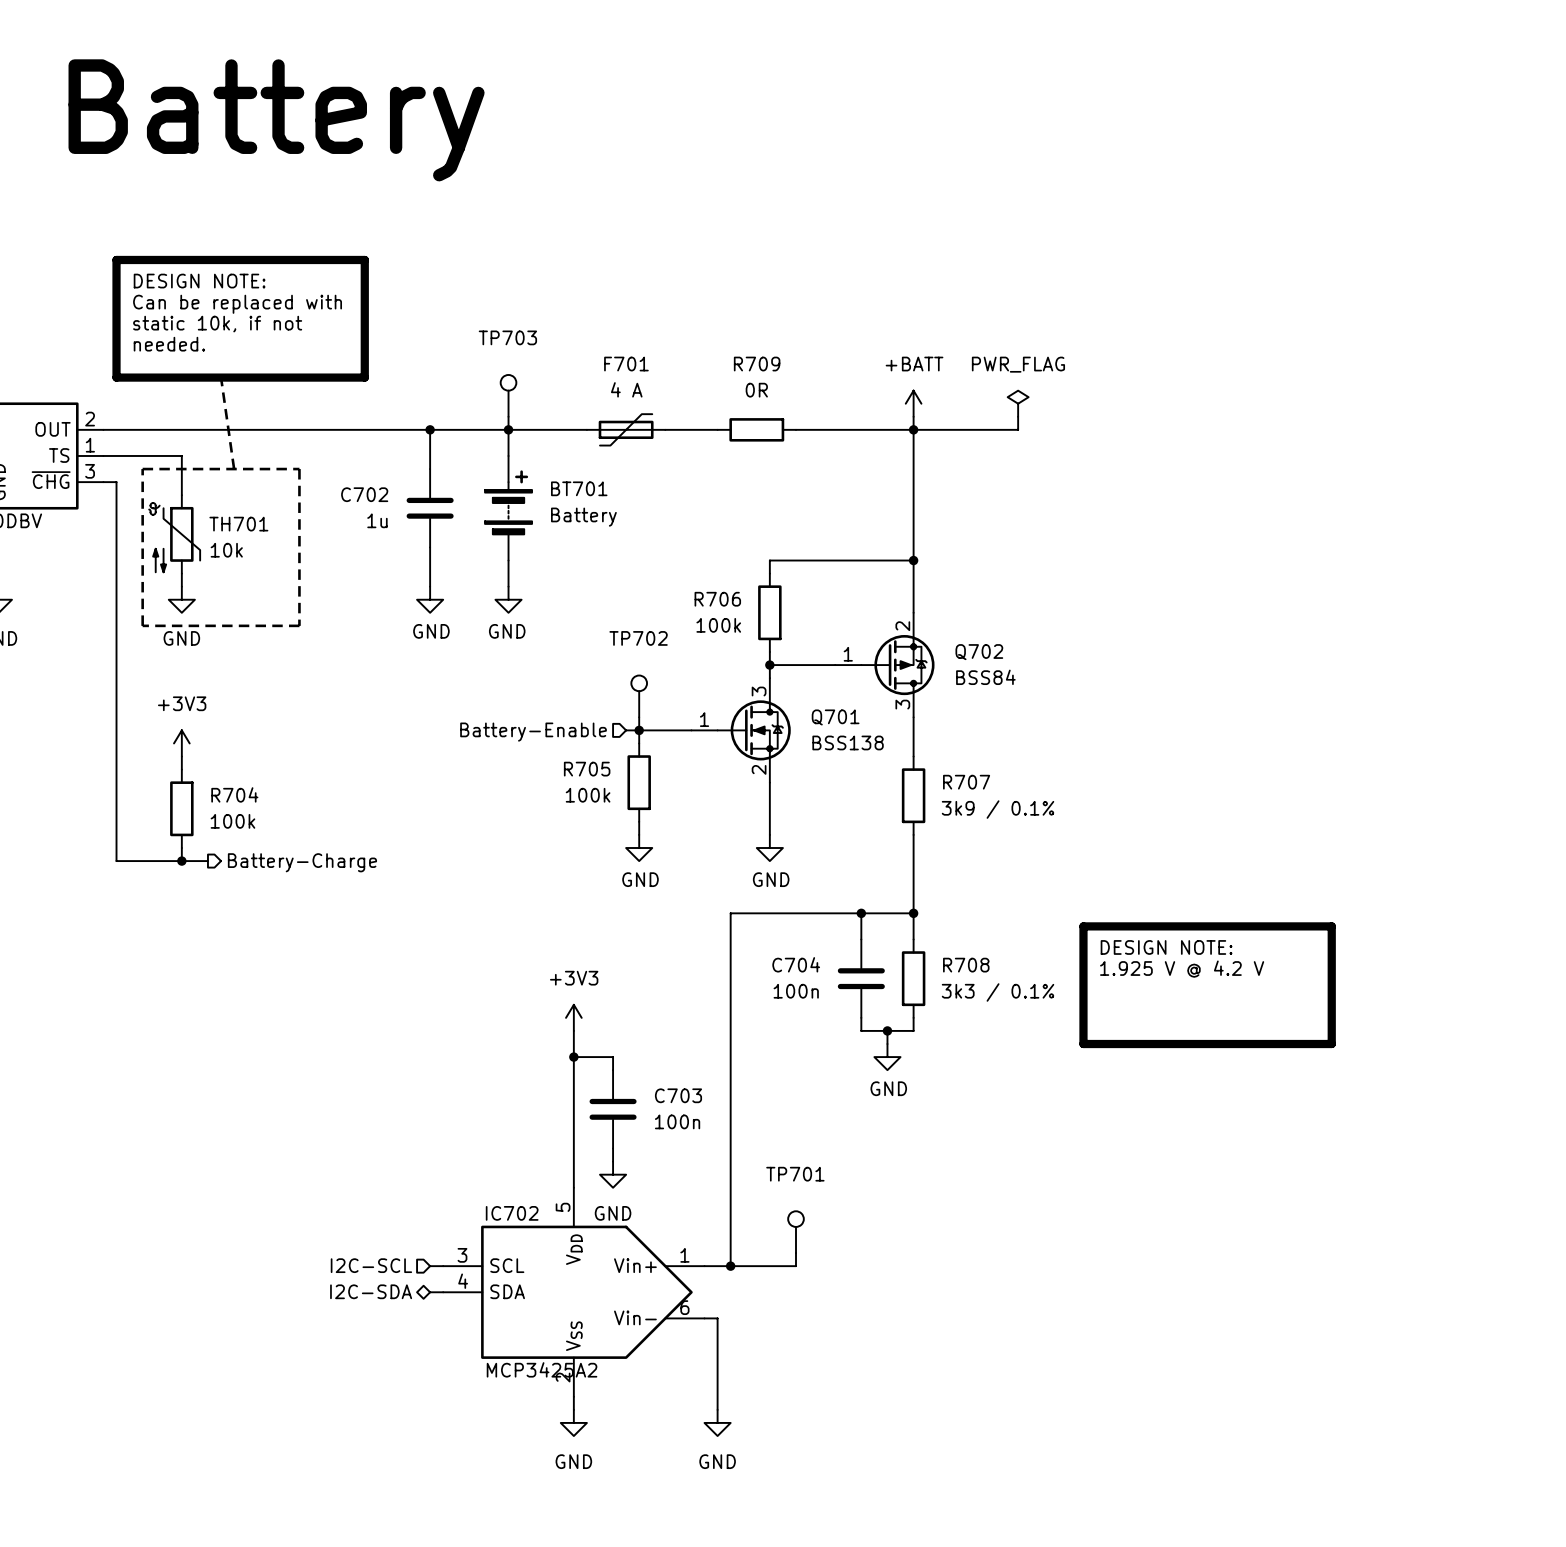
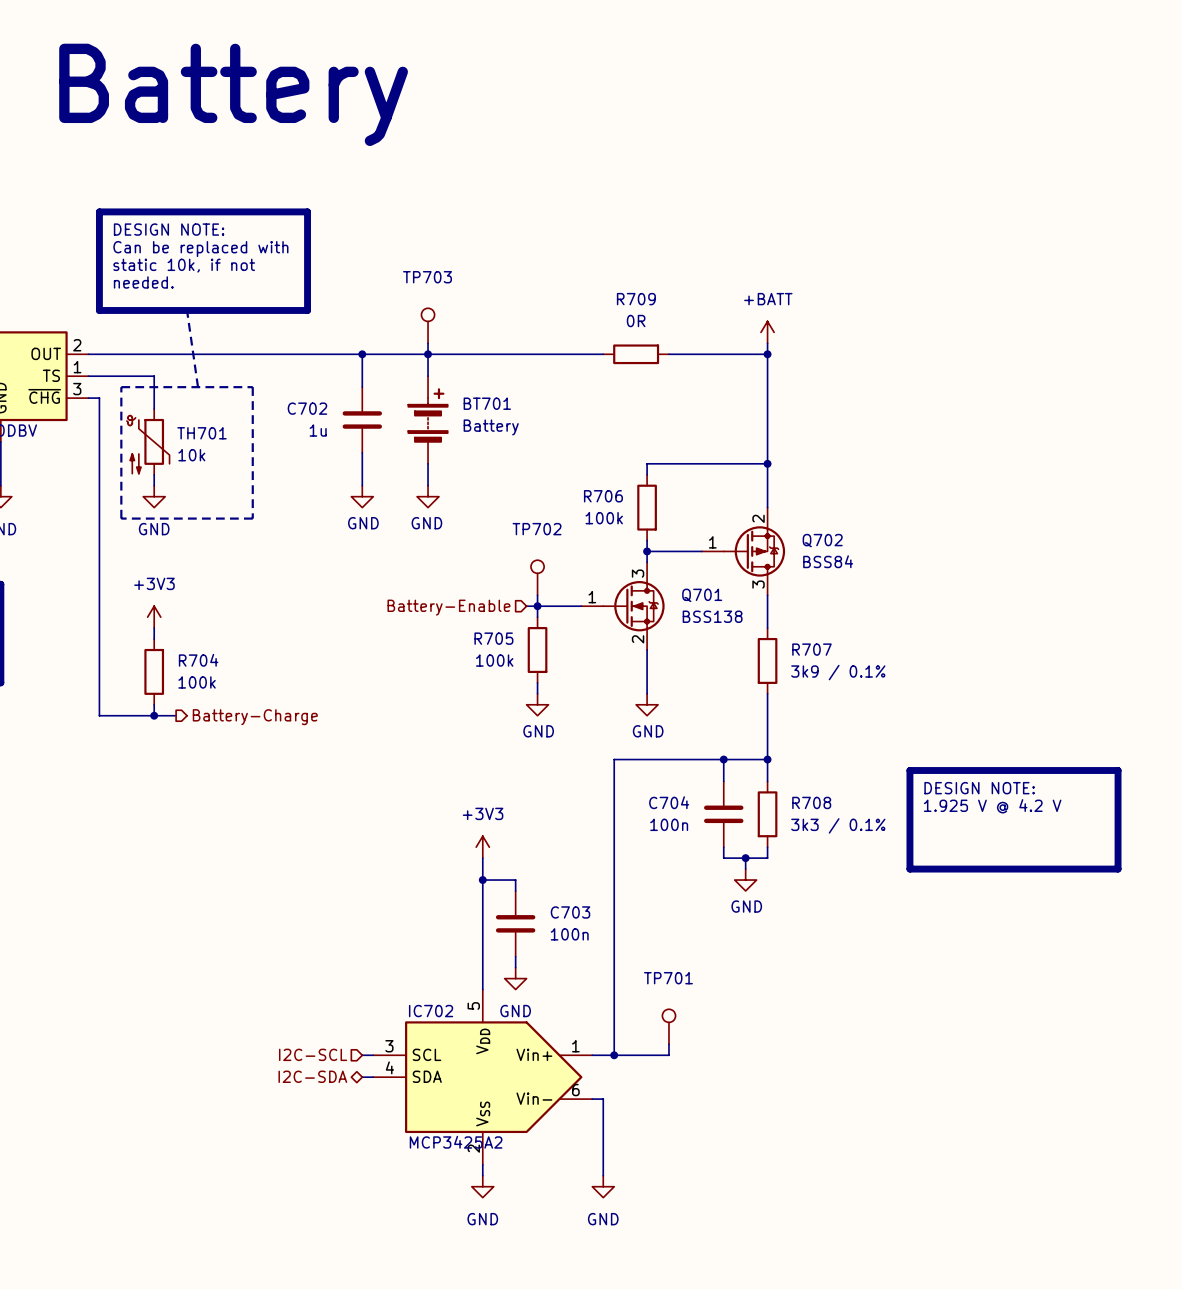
power symbol: PWR_FLAG (1018, 403) -> none
wire: (1018, 416) (1018, 429) (913, 429) -> none
F701: 4 A (626, 429) -> none

